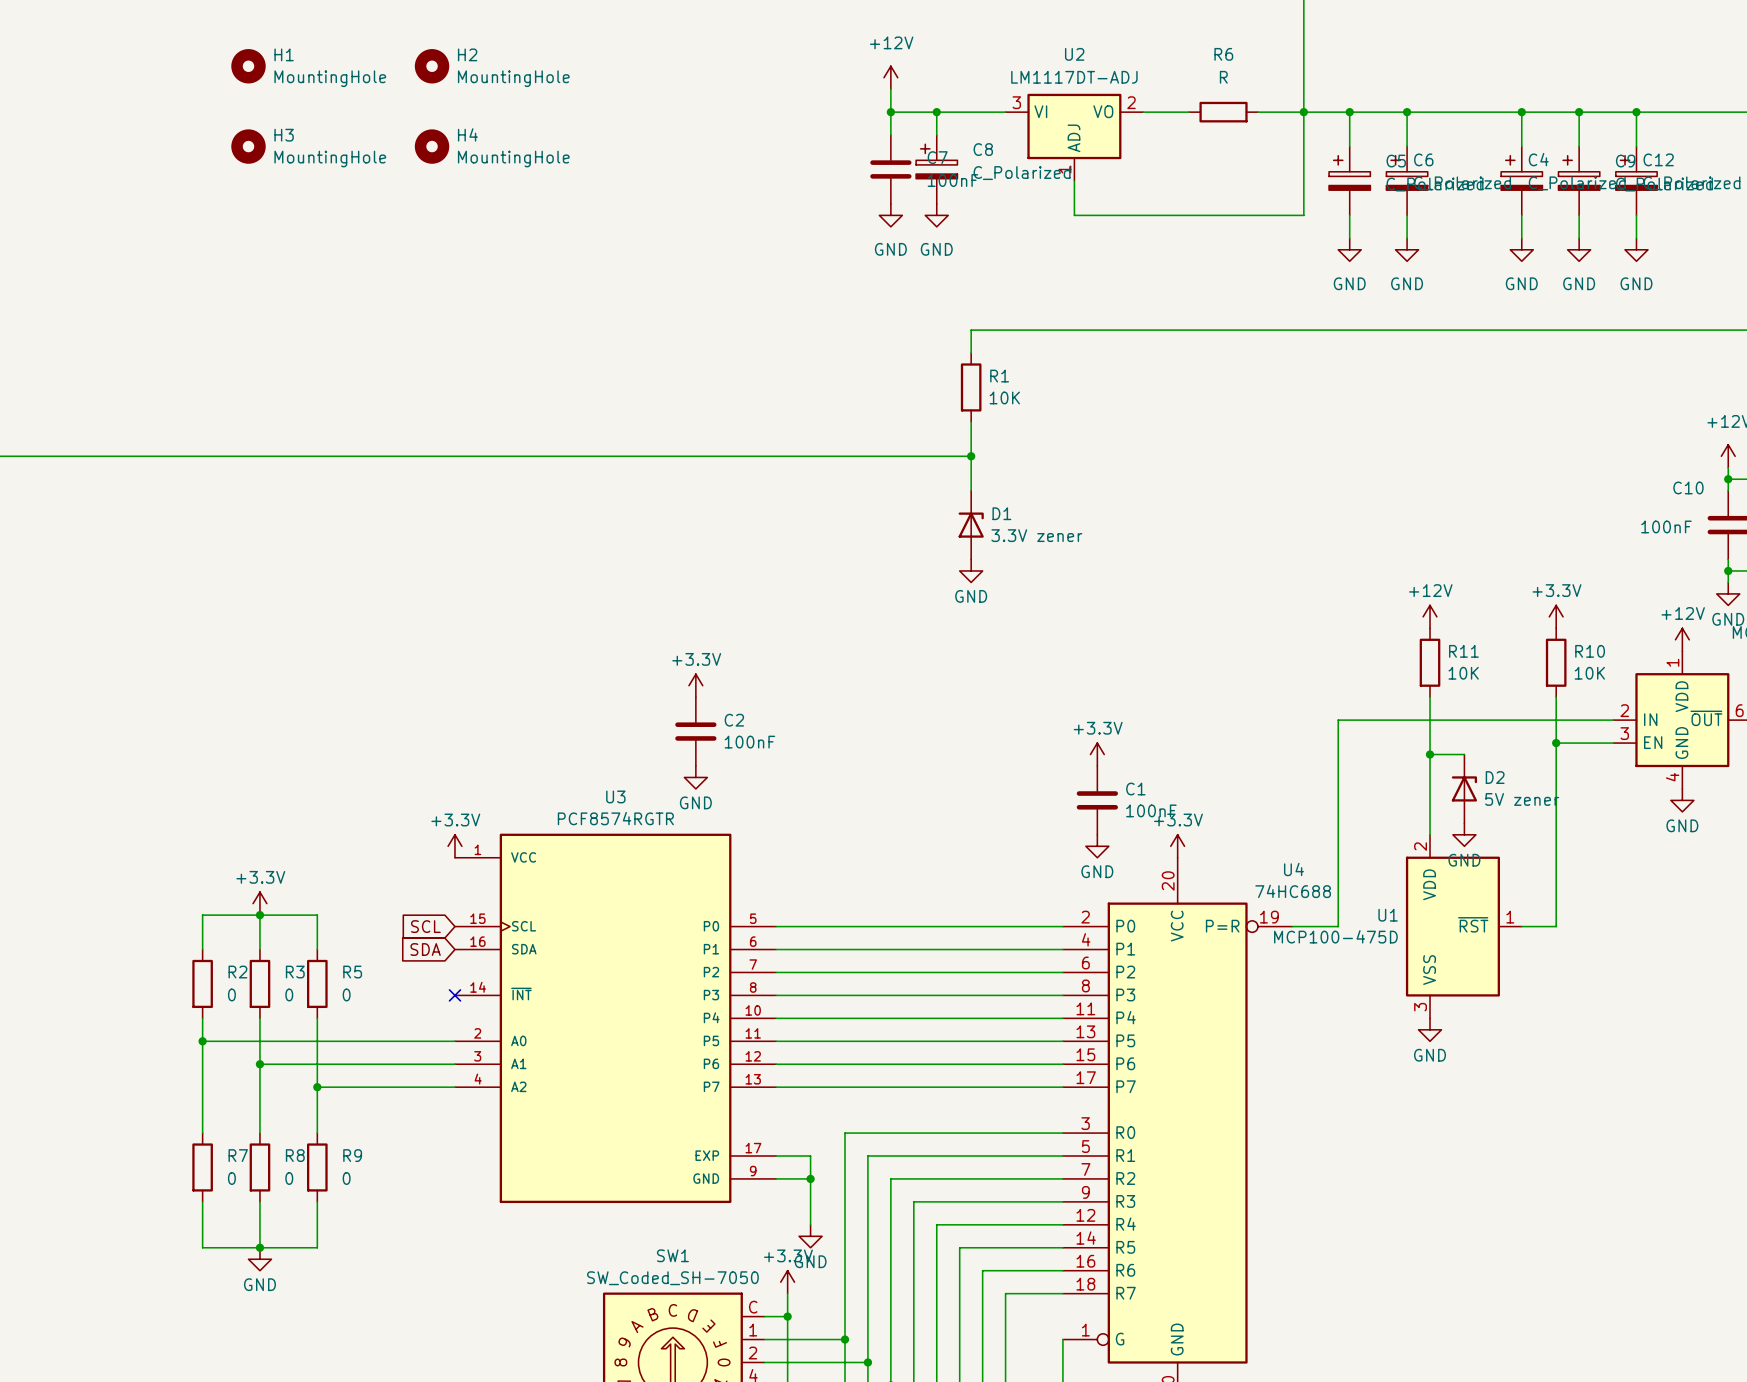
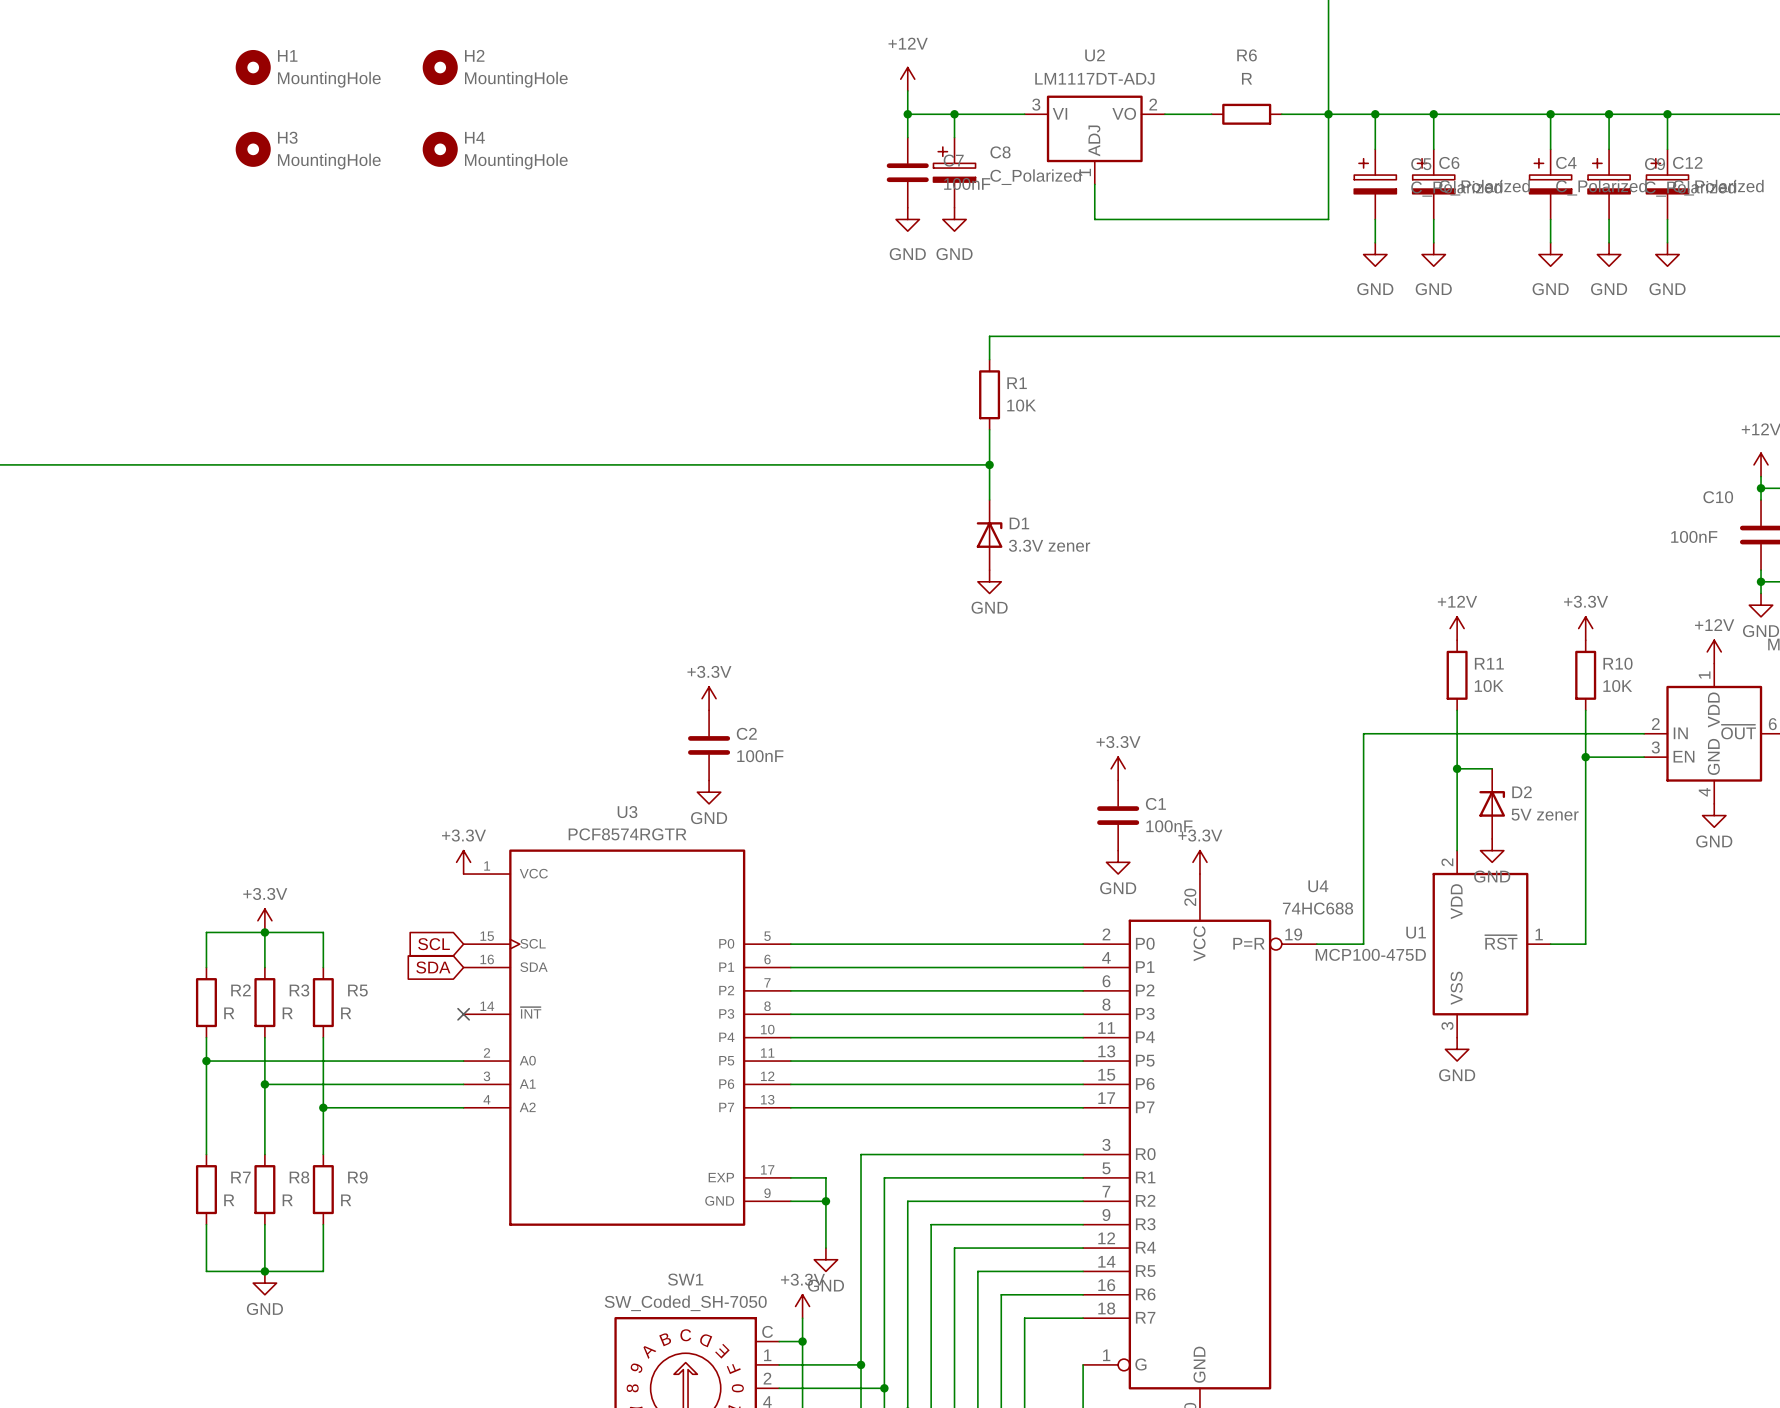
R2 value: 0 (231, 994) -> R (229, 1013)
R3 value: 0 (289, 994) -> R (287, 1013)
R5 value: 0 (346, 994) -> R (346, 1013)
R7 value: 0 (231, 1178) -> R (229, 1200)
R8 value: 0 (289, 1178) -> R (287, 1200)
R9 value: 0 (346, 1178) -> R (346, 1200)

